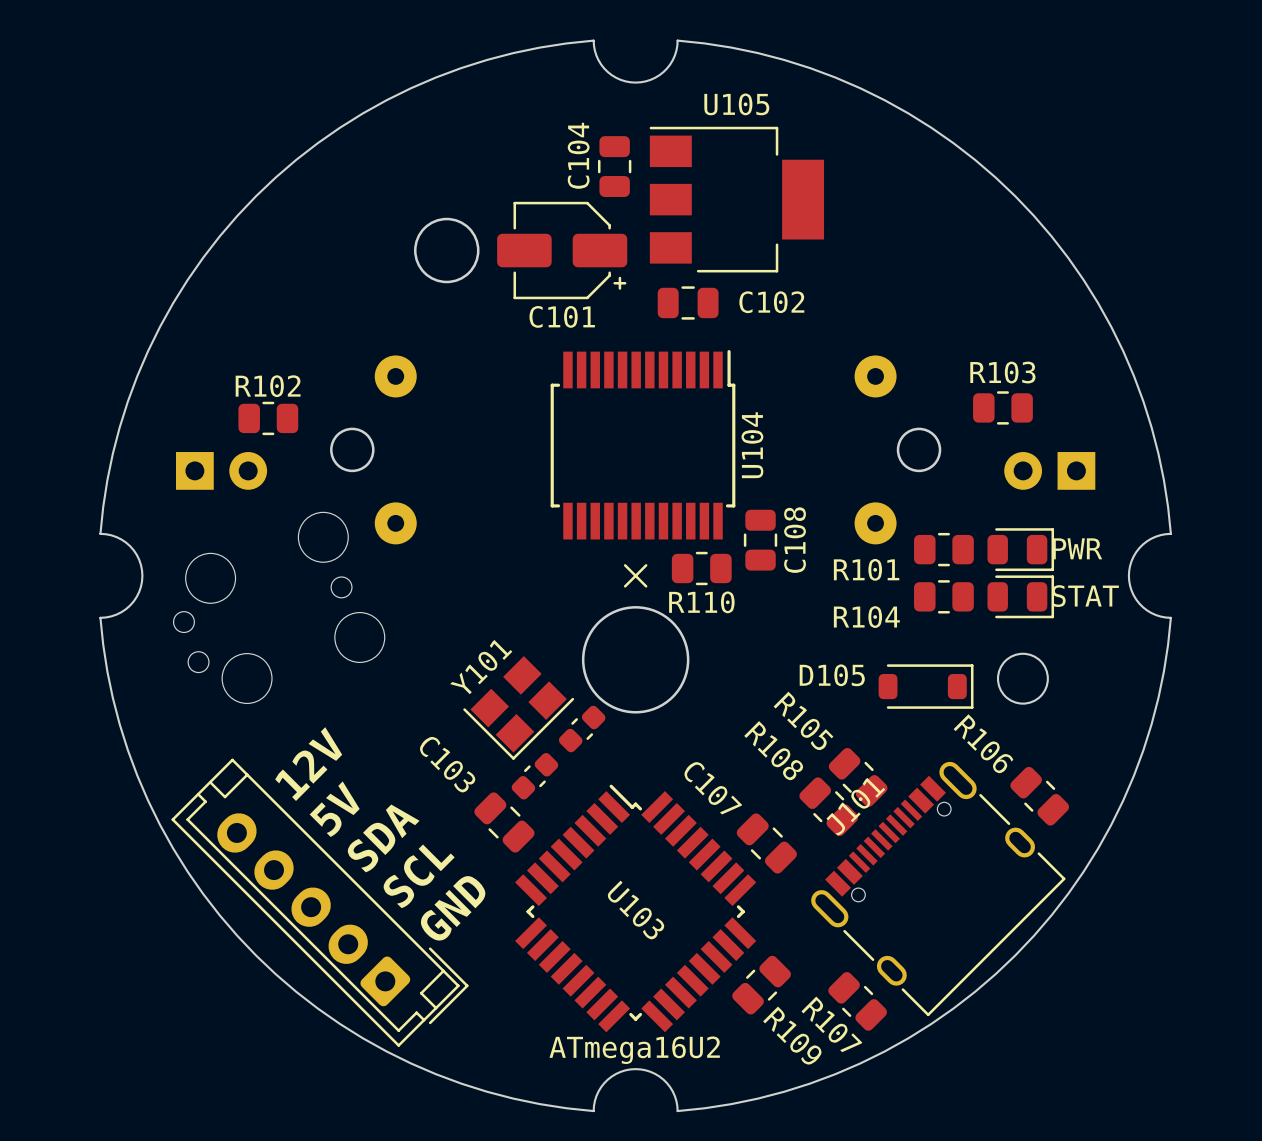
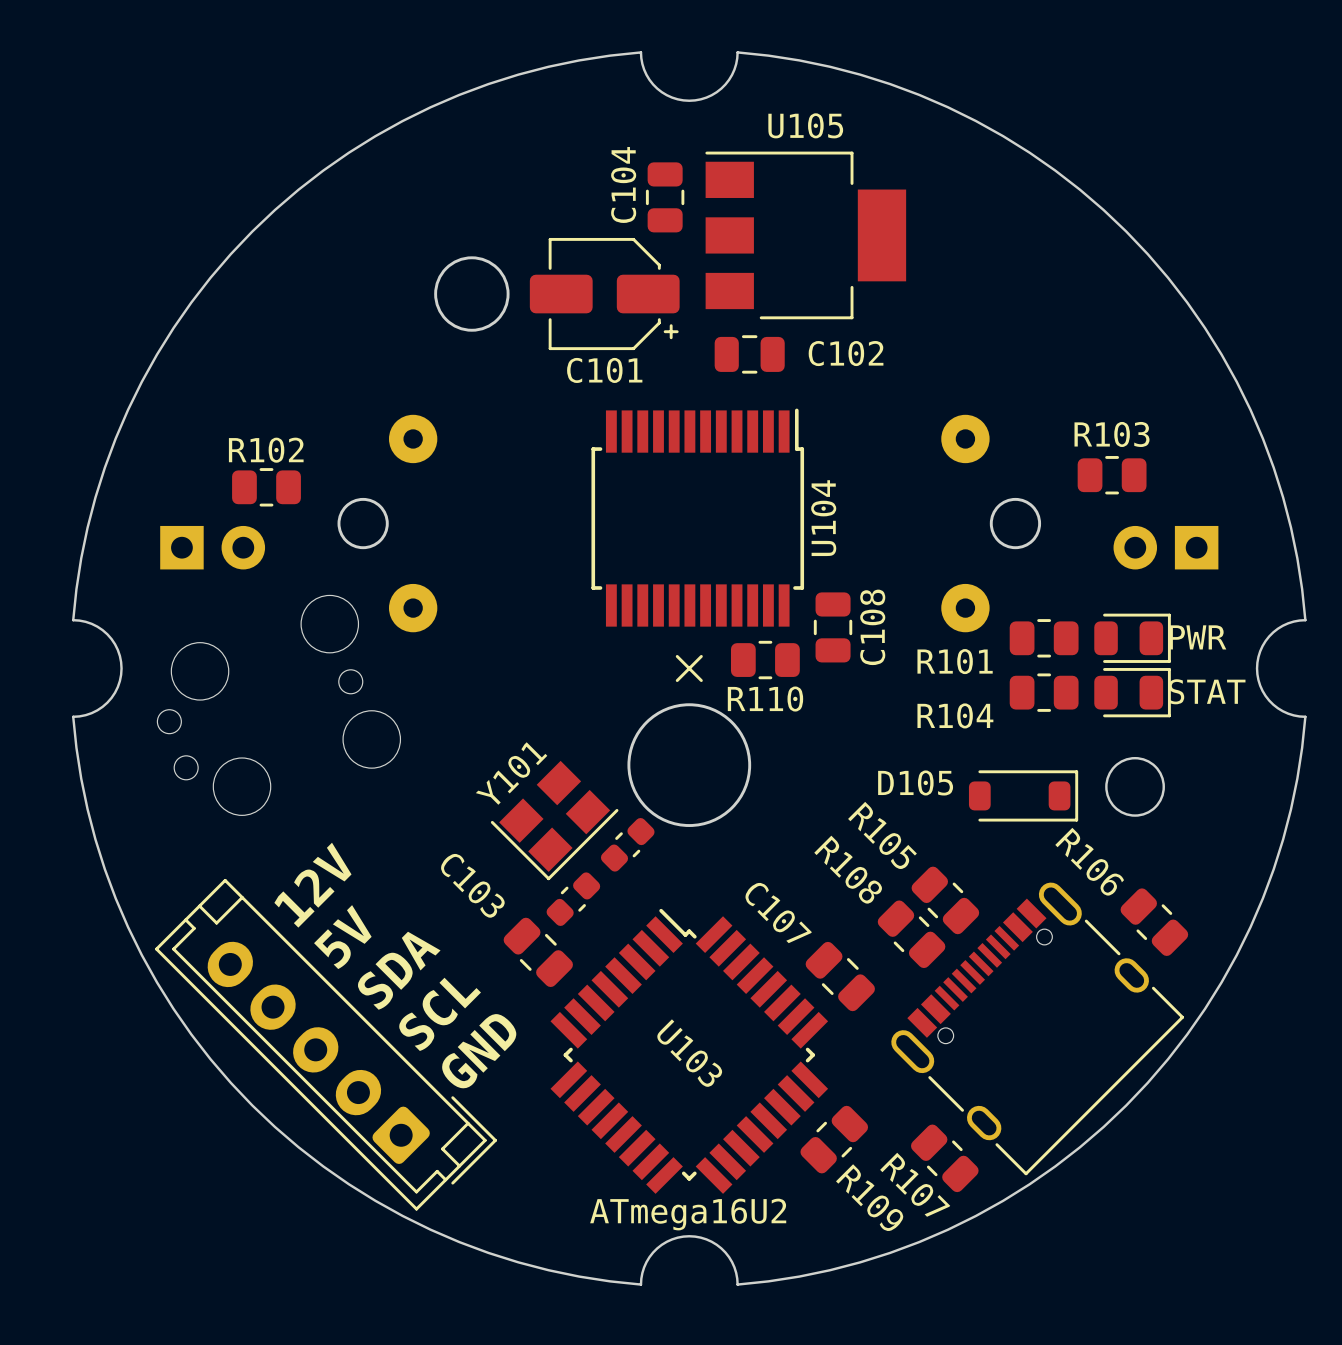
J101: (938, 888) -> none

